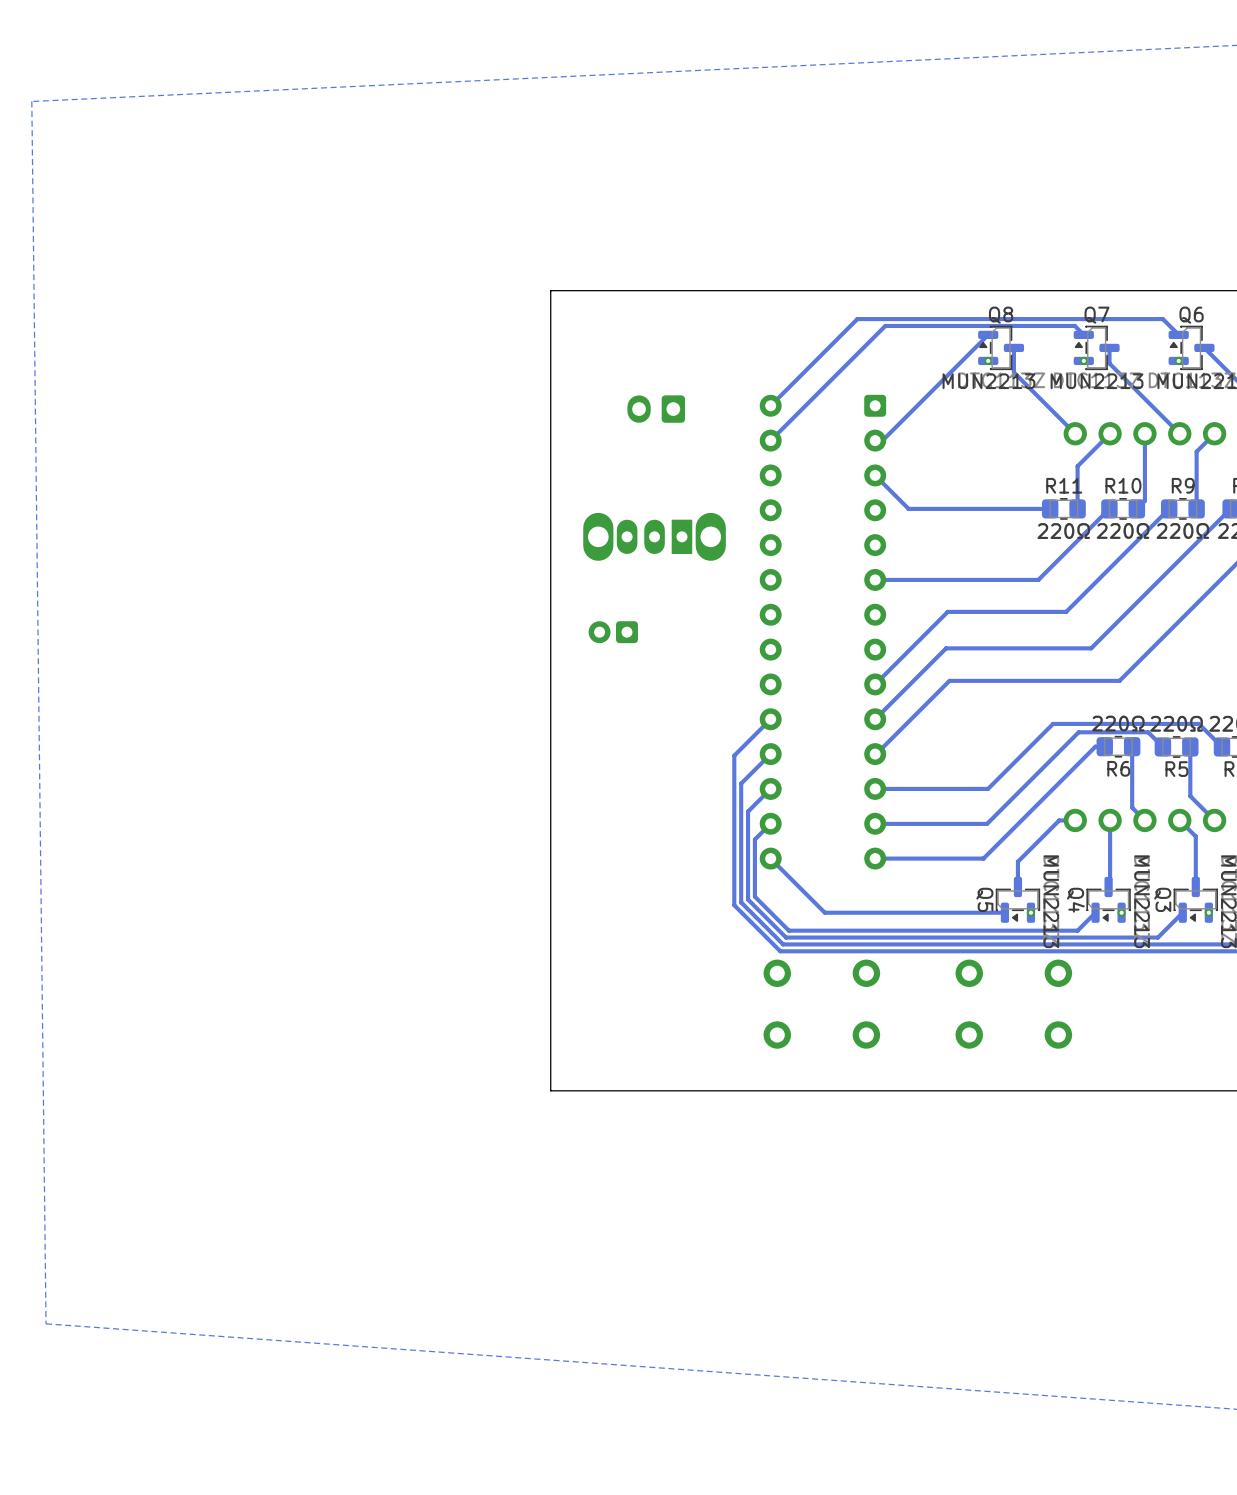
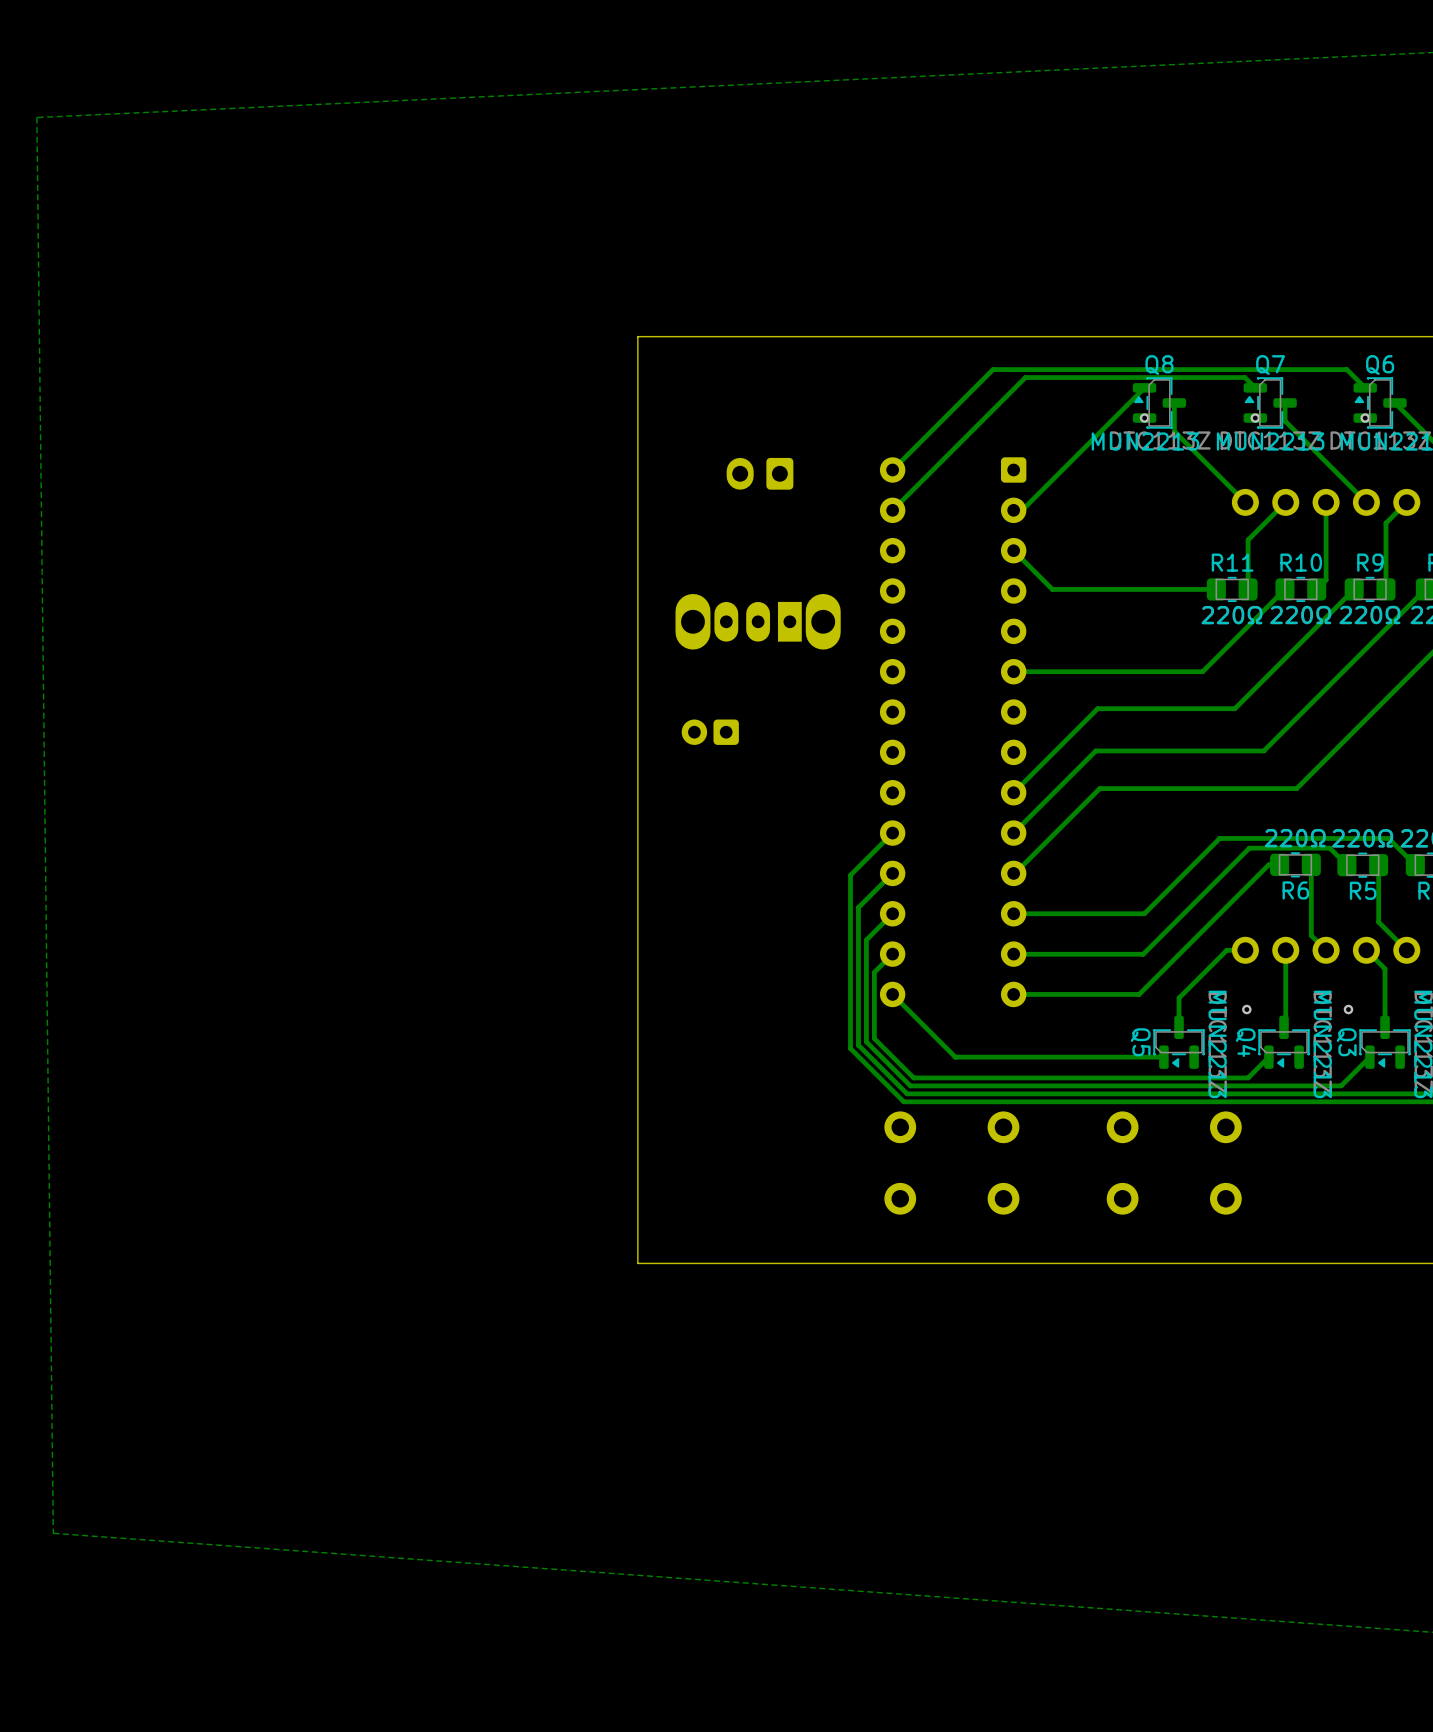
via: none -> (1246, 1009)
via: none -> (1348, 1009)
via: (1030, 912) -> none
via: (1121, 912) -> none
via: (1208, 912) -> none

